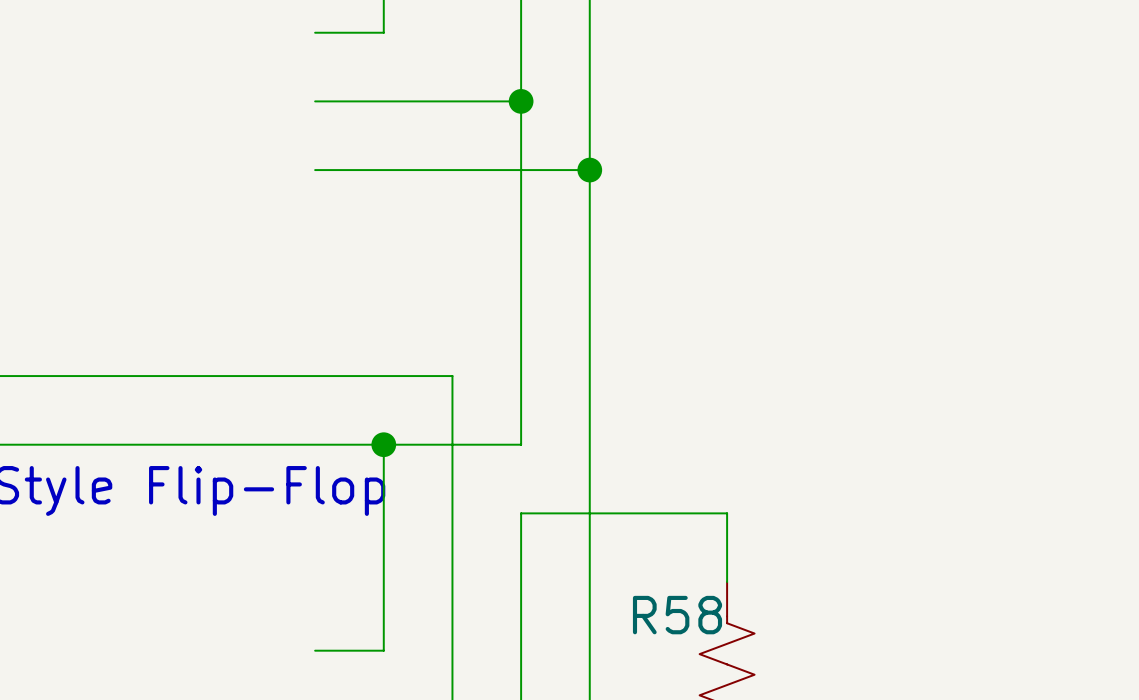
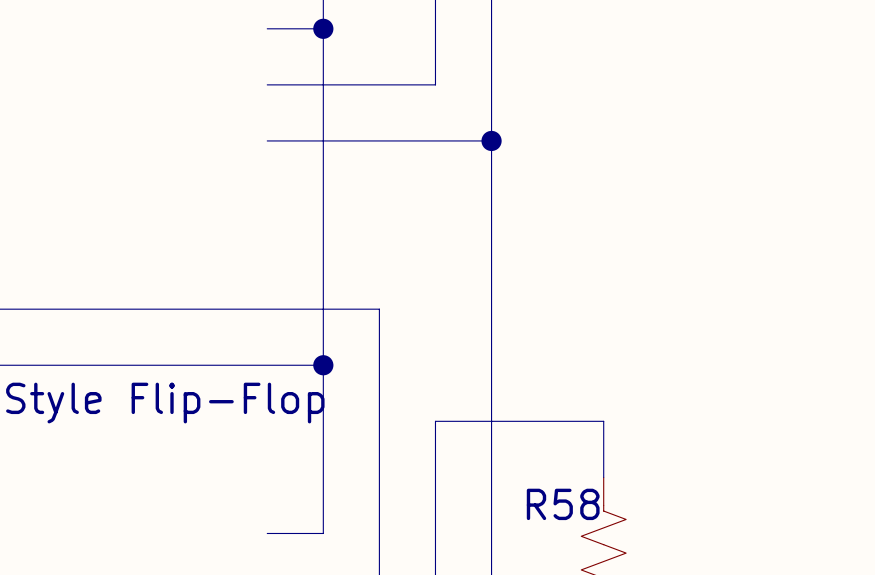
wire: (521, 101) (521, 444) (383, 444) -> (323, 28) (323, 365)
junction position: (521, 101) -> (323, 28)

